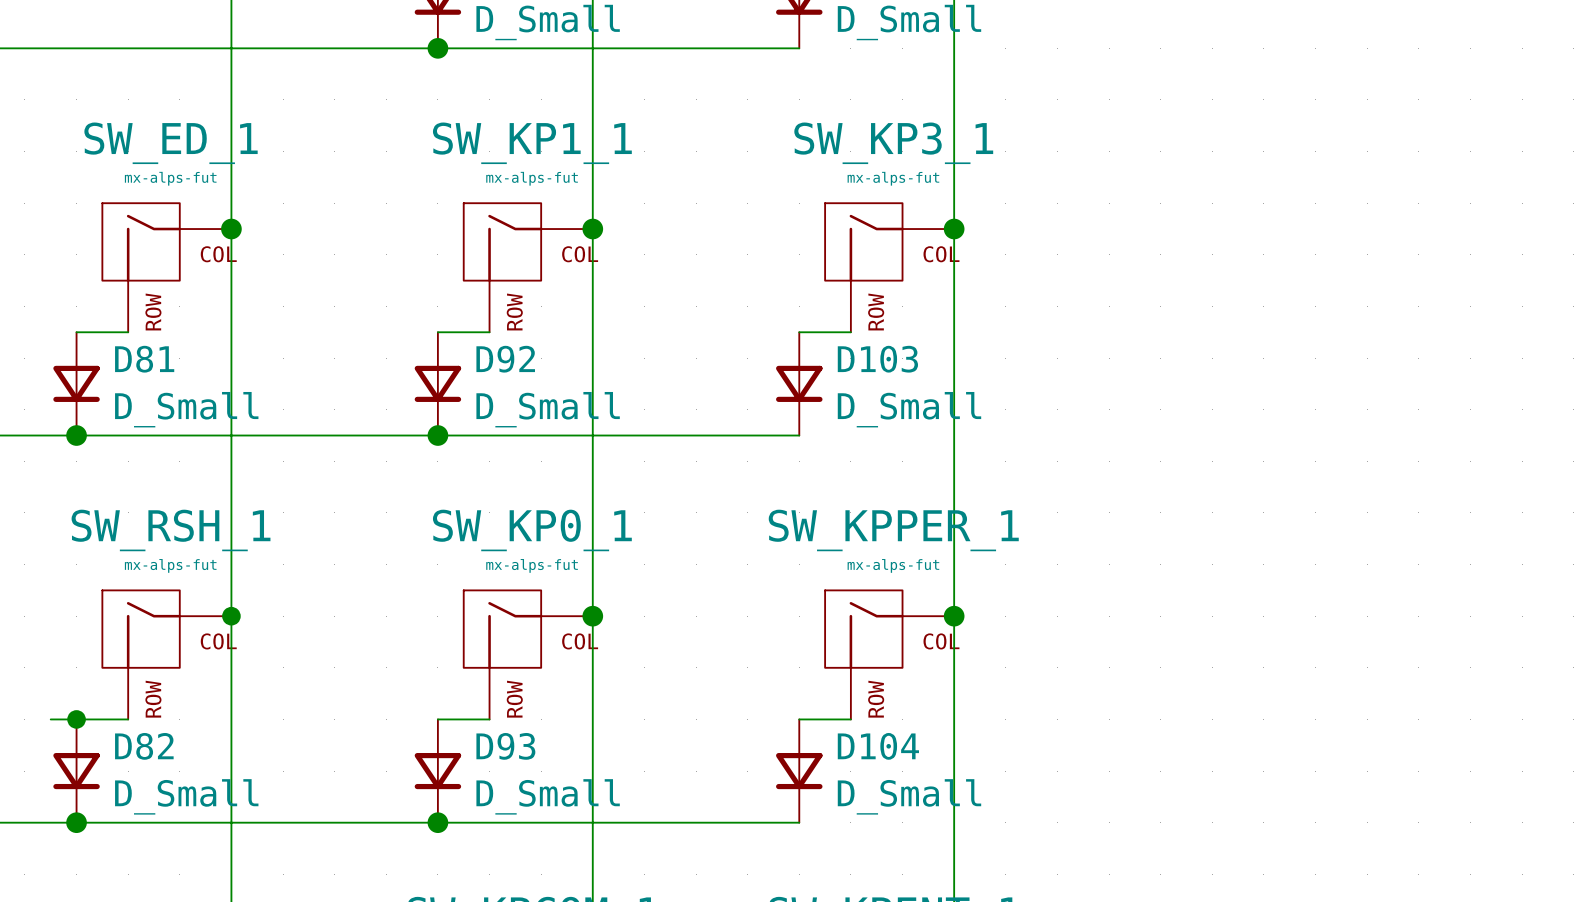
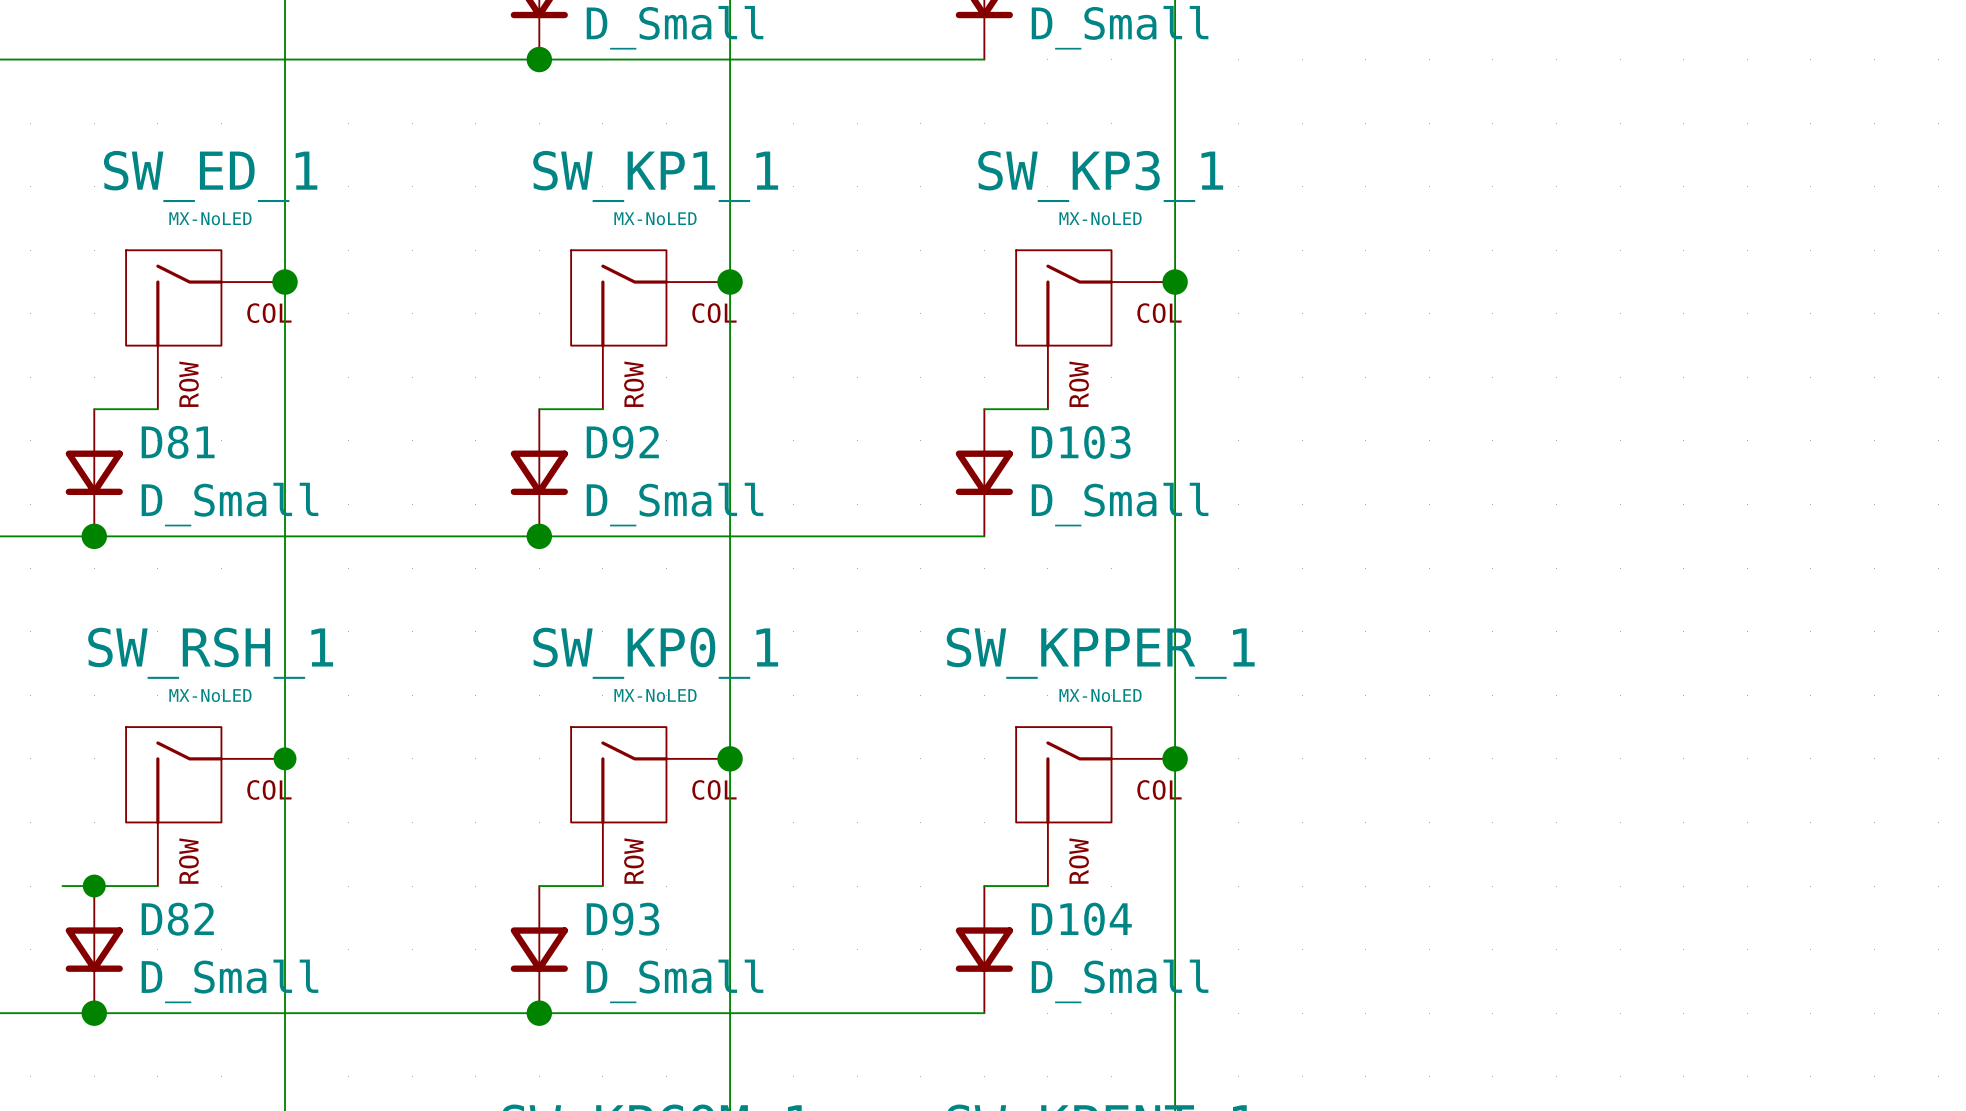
SW_ED_1 value: mx-alps-fut (170, 178) -> MX-NoLED (210, 218)
SW_KP1_1 value: mx-alps-fut (532, 178) -> MX-NoLED (655, 218)
SW_KP3_1 value: mx-alps-fut (893, 178) -> MX-NoLED (1100, 218)
SW_RSH_1 value: mx-alps-fut (170, 565) -> MX-NoLED (210, 695)
SW_KP0_1 value: mx-alps-fut (532, 565) -> MX-NoLED (655, 695)
SW_KPPER_1 value: mx-alps-fut (893, 565) -> MX-NoLED (1100, 695)

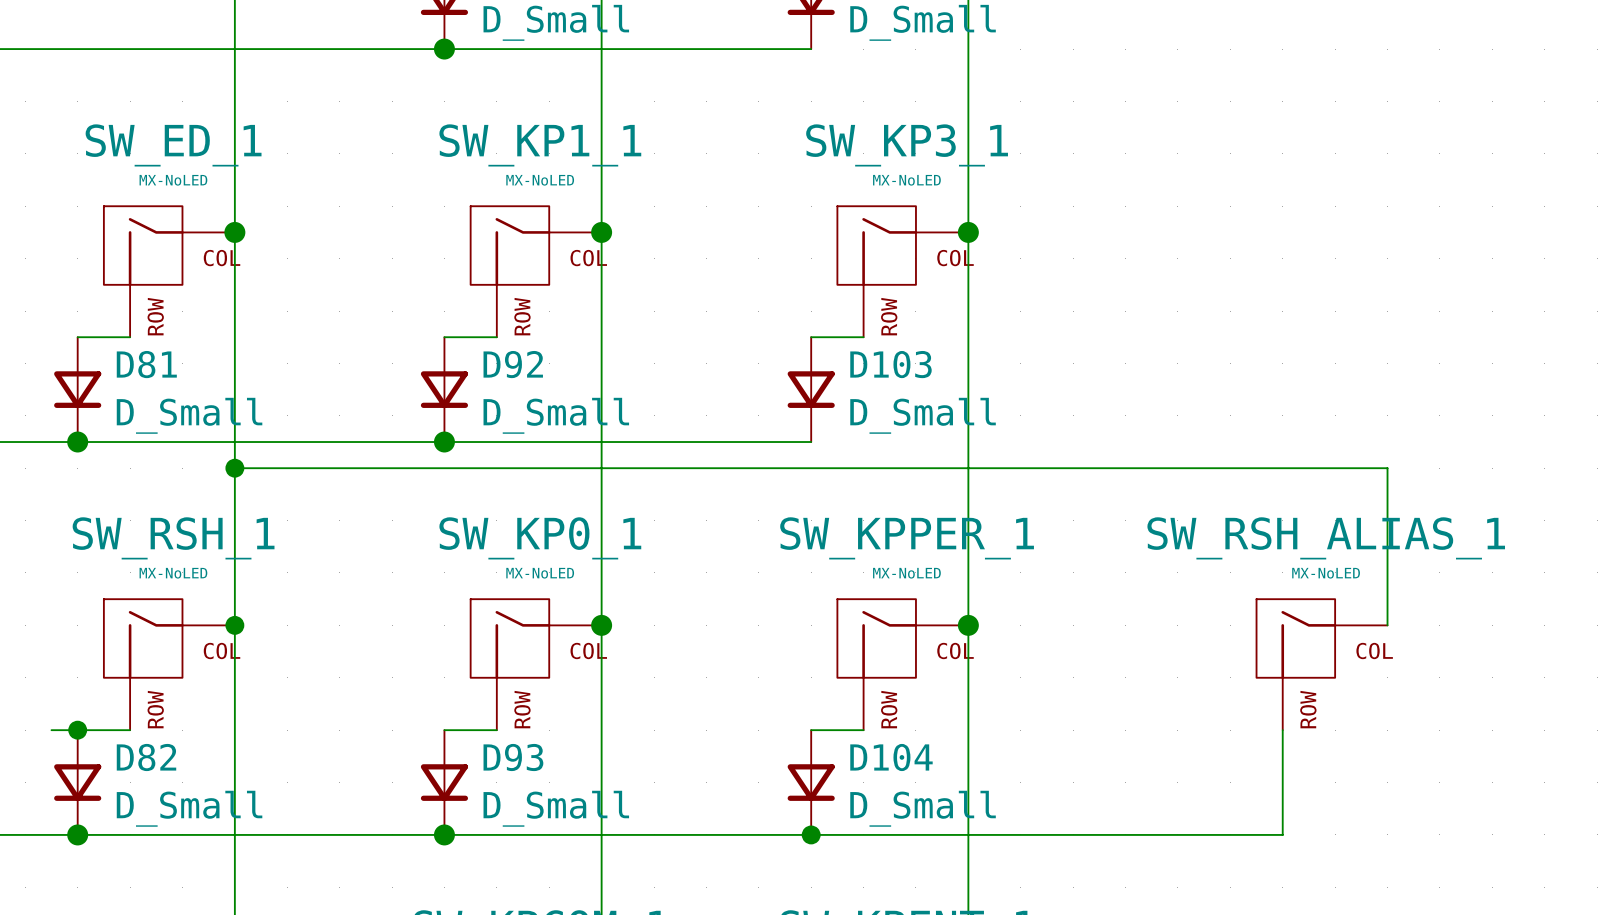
wire: none -> (234, 468) (1387, 468) (1387, 625)
junction: none -> (234, 468)
SW_RSH_ALIAS_1: none -> MX-NoLED (1322, 664)
wire: none -> (1282, 730) (1282, 834) (811, 834)
junction: none -> (811, 834)

